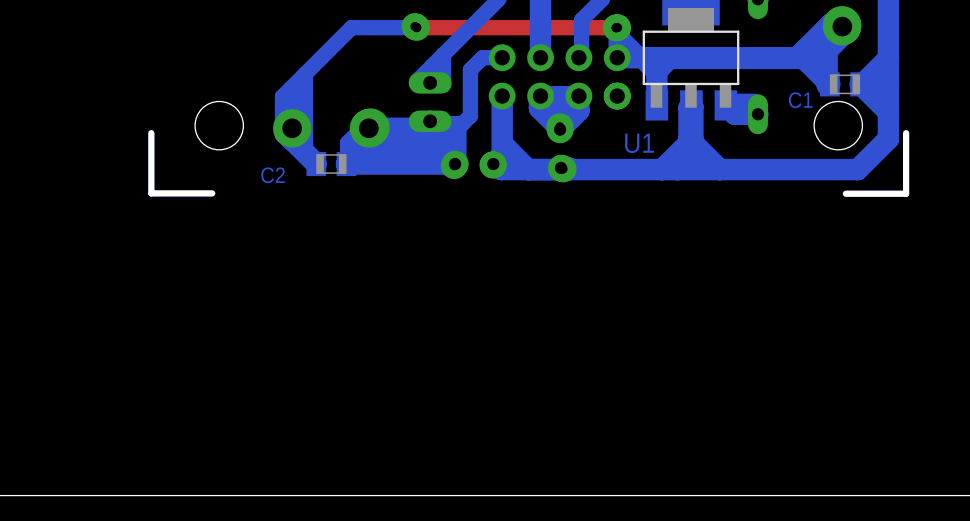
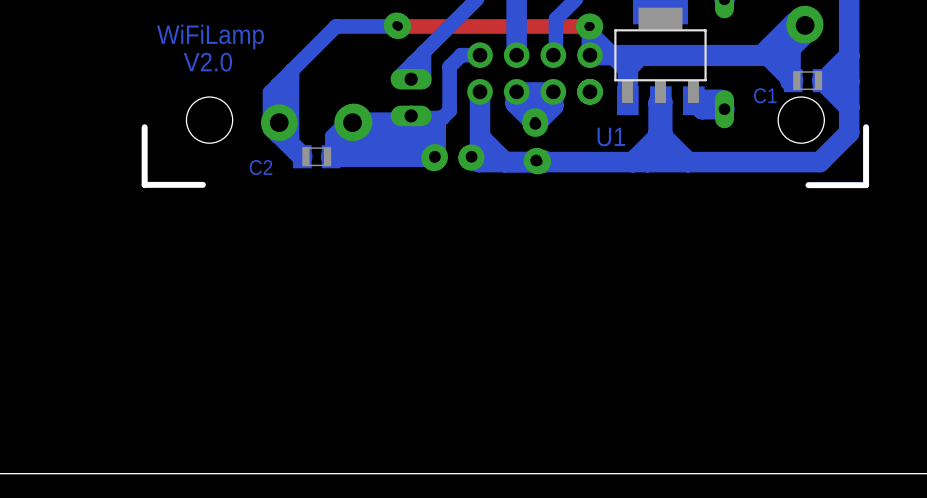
text: none -> WiFiLamp (210, 36)
text: none -> V2.0 (207, 62)

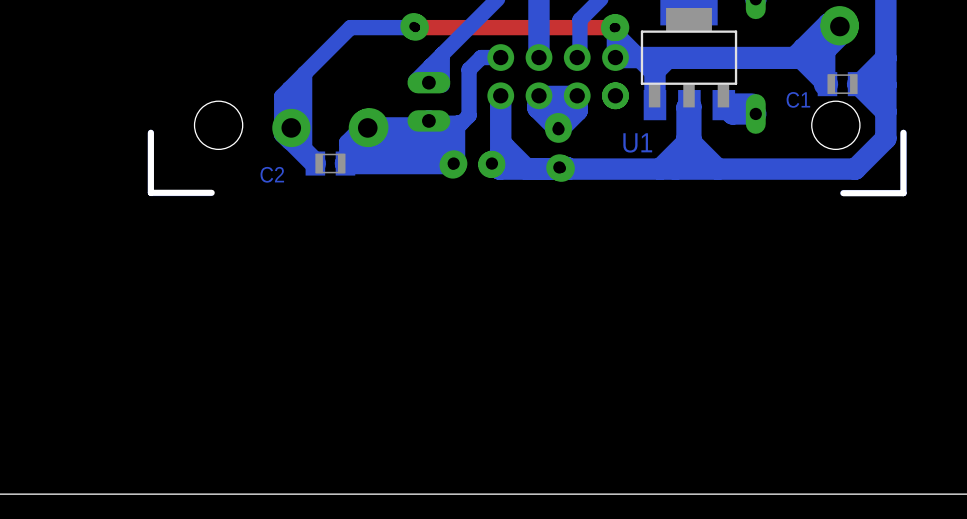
text: WiFiLamp (210, 36) -> none
text: V2.0 (207, 62) -> none

